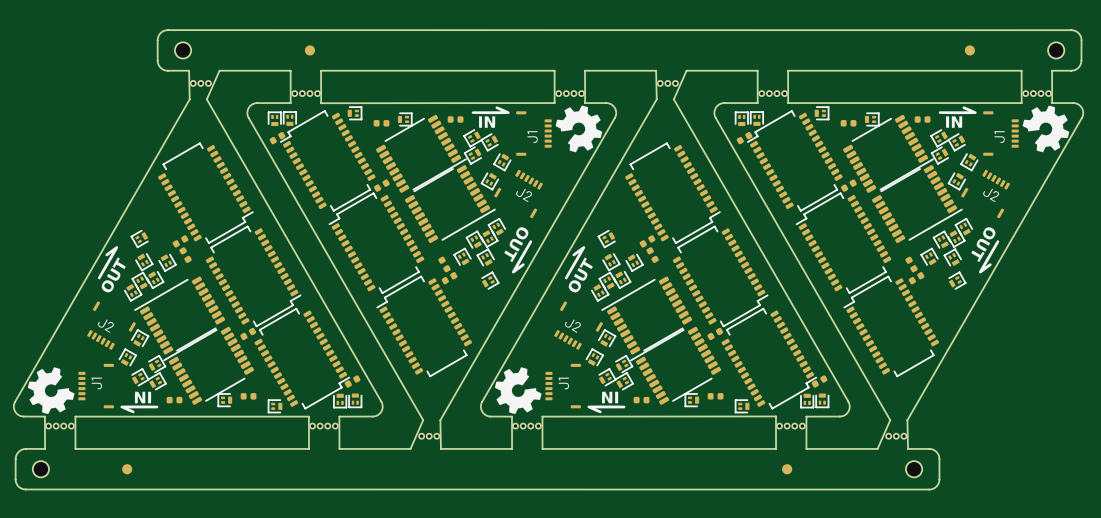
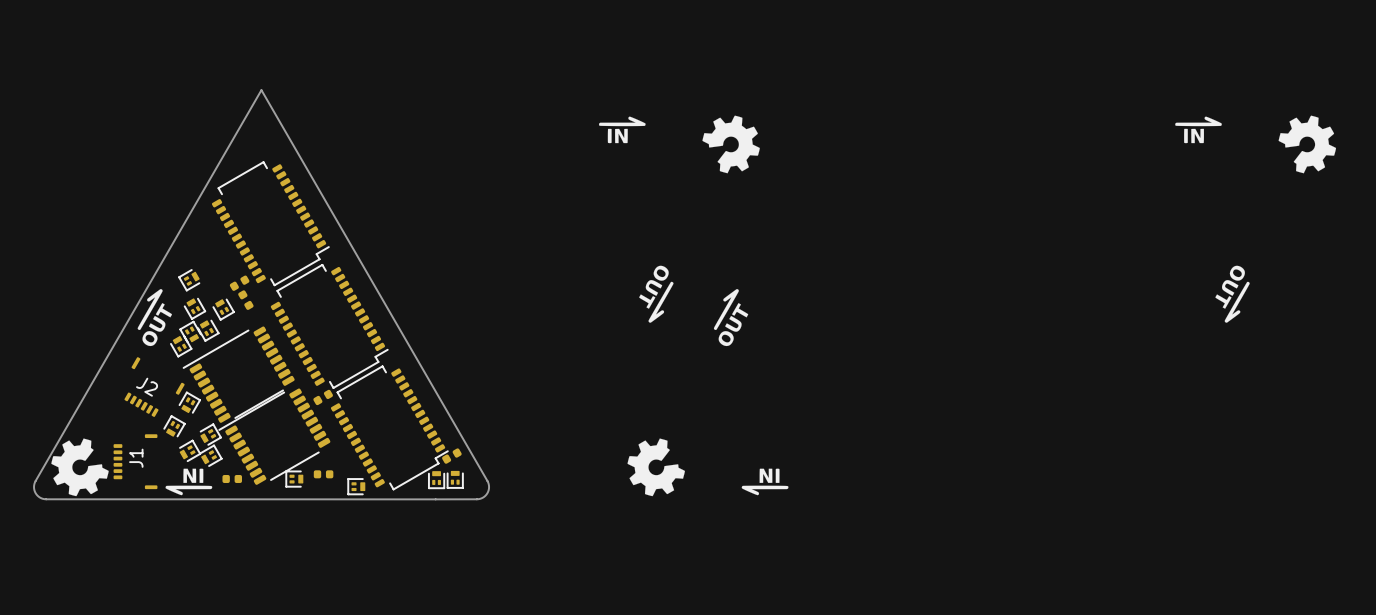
part: (183, 50) -> none
part: (309, 50) -> none
part: (969, 50) -> none
part: (1056, 50) -> none
board edge: (321, 70) (554, 70) (554, 103) (321, 103) (321, 70) -> none
board edge: (585, 70) (656, 70) (656, 99) (481, 402) (481, 410) (487, 415) (512, 416) (512, 448) (440, 448) (440, 420) (615, 116) (615, 109) (610, 103) (585, 103) (585, 70) -> none
board edge: (686, 70) (757, 70) (757, 103) (721, 103) (715, 108) (714, 115) (890, 420) (877, 448) (806, 448) (806, 416) (842, 416) (848, 411) (849, 404) (673, 99) (686, 70) -> none
board edge: (788, 70) (1021, 70) (1021, 103) (788, 103) (788, 70) -> none
part: (193, 83) -> none
part: (200, 83) -> none
part: (208, 83) -> none
part: (660, 83) -> none
part: (667, 83) -> none
part: (675, 83) -> none
part: (294, 93) -> none
part: (302, 93) -> none
part: (309, 93) -> none
part: (317, 93) -> none
part: (558, 93) -> none
part: (566, 93) -> none
part: (573, 93) -> none
part: (581, 93) -> none
part: (761, 93) -> none
part: (769, 93) -> none
part: (776, 93) -> none
part: (784, 93) -> none
part: (1025, 93) -> none
part: (1033, 93) -> none
part: (1040, 93) -> none
part: (1048, 93) -> none
part: (354, 113) -> none
part: (821, 113) -> none
part: (274, 118) -> none
part: (289, 118) -> none
part: (741, 118) -> none
part: (756, 118) -> none
part: (405, 119) -> none
part: (455, 119) -> none
part: (872, 119) -> none
part: (922, 119) -> none
part: (381, 123) -> none
part: (848, 123) -> none
J1: (533, 133) -> none
J1: (1000, 133) -> none
part: (277, 138) -> none
part: (472, 138) -> none
part: (744, 138) -> none
part: (939, 138) -> none
part: (489, 142) -> none
part: (956, 142) -> none
part: (421, 153) -> none
part: (888, 153) -> none
part: (472, 155) -> none
part: (939, 155) -> none
part: (327, 160) -> none
part: (794, 160) -> none
part: (502, 162) -> none
part: (969, 162) -> none
part: (489, 181) -> none
part: (956, 181) -> none
part: (381, 185) -> none
part: (848, 185) -> none
part: (672, 193) -> none
J2: (518, 194) -> none
J2: (985, 194) -> none
part: (450, 204) -> none
part: (917, 204) -> none
part: (496, 226) -> none
part: (963, 226) -> none
part: (489, 238) -> none
part: (956, 238) -> none
part: (474, 239) -> none
part: (606, 239) -> none
part: (941, 239) -> none
part: (647, 241) -> none
part: (376, 243) -> none
part: (843, 243) -> none
part: (652, 255) -> none
part: (462, 256) -> none
part: (929, 256) -> none
part: (485, 257) -> none
part: (952, 257) -> none
part: (611, 262) -> none
part: (634, 262) -> none
part: (444, 264) -> none
part: (911, 264) -> none
part: (720, 276) -> none
part: (449, 278) -> none
part: (916, 278) -> none
part: (622, 279) -> none
part: (490, 280) -> none
part: (607, 280) -> none
part: (957, 280) -> none
part: (600, 292) -> none
part: (646, 315) -> none
J2: (578, 325) -> none
part: (424, 326) -> none
part: (891, 326) -> none
part: (715, 334) -> none
part: (607, 338) -> none
part: (594, 357) -> none
part: (769, 358) -> none
part: (624, 364) -> none
part: (675, 365) -> none
part: (607, 377) -> none
part: (624, 381) -> none
part: (819, 381) -> none
J1: (563, 386) -> none
part: (715, 396) -> none
part: (641, 400) -> none
part: (691, 400) -> none
part: (807, 400) -> none
part: (822, 400) -> none
board edge: (15, 401) (189, 99) (189, 70) (165, 70) (158, 63) (157, 38) (163, 30) (1071, 30) (1077, 32) (1080, 36) (1081, 60) (1079, 66) (1072, 70) (1052, 70) (1052, 103) (1077, 103) (1082, 109) (1082, 116) (907, 420) (908, 448) (931, 449) (938, 455) (939, 480) (933, 488) (24, 489) (18, 486) (15, 482) (16, 456) (23, 449) (45, 448) (44, 416) (23, 416) -> (435, 499) (46, 499)
board edge: (381, 401) (206, 99) (219, 70) (290, 70) (290, 103) (254, 103) (248, 109) (248, 116) (423, 420) (410, 448) (339, 448) (339, 416) -> (487, 480) (261, 90) (35, 480)
part: (742, 406) -> none
board edge: (75, 416) (75, 448) (309, 448) (308, 416) (75, 416) -> none
board edge: (775, 416) (542, 416) (542, 448) (776, 448) (775, 416) -> none
part: (48, 426) -> none
part: (56, 426) -> none
part: (63, 426) -> none
part: (71, 426) -> none
part: (312, 426) -> none
part: (320, 426) -> none
part: (327, 426) -> none
part: (335, 426) -> none
part: (515, 426) -> none
part: (523, 426) -> none
part: (530, 426) -> none
part: (538, 426) -> none
part: (779, 426) -> none
part: (787, 426) -> none
part: (794, 426) -> none
part: (802, 426) -> none
part: (421, 436) -> none
part: (429, 436) -> none
part: (436, 436) -> none
part: (888, 436) -> none
part: (896, 436) -> none
part: (903, 436) -> none
part: (40, 469) -> none
part: (127, 469) -> none
part: (787, 469) -> none
part: (914, 469) -> none

